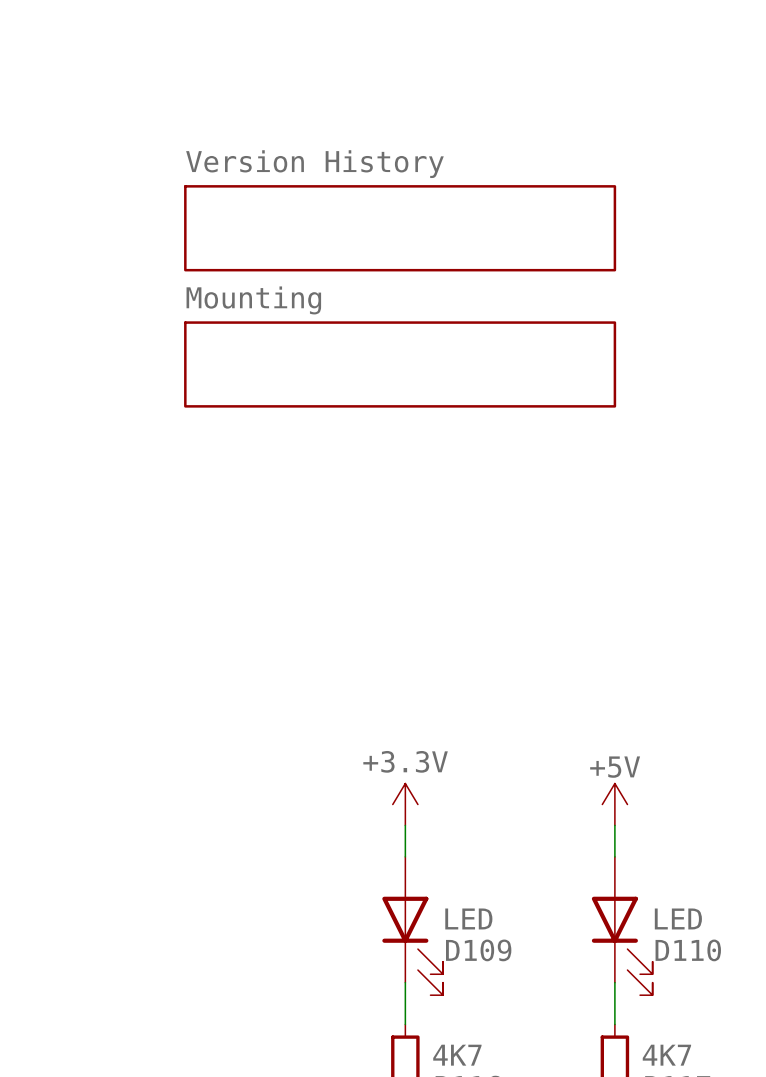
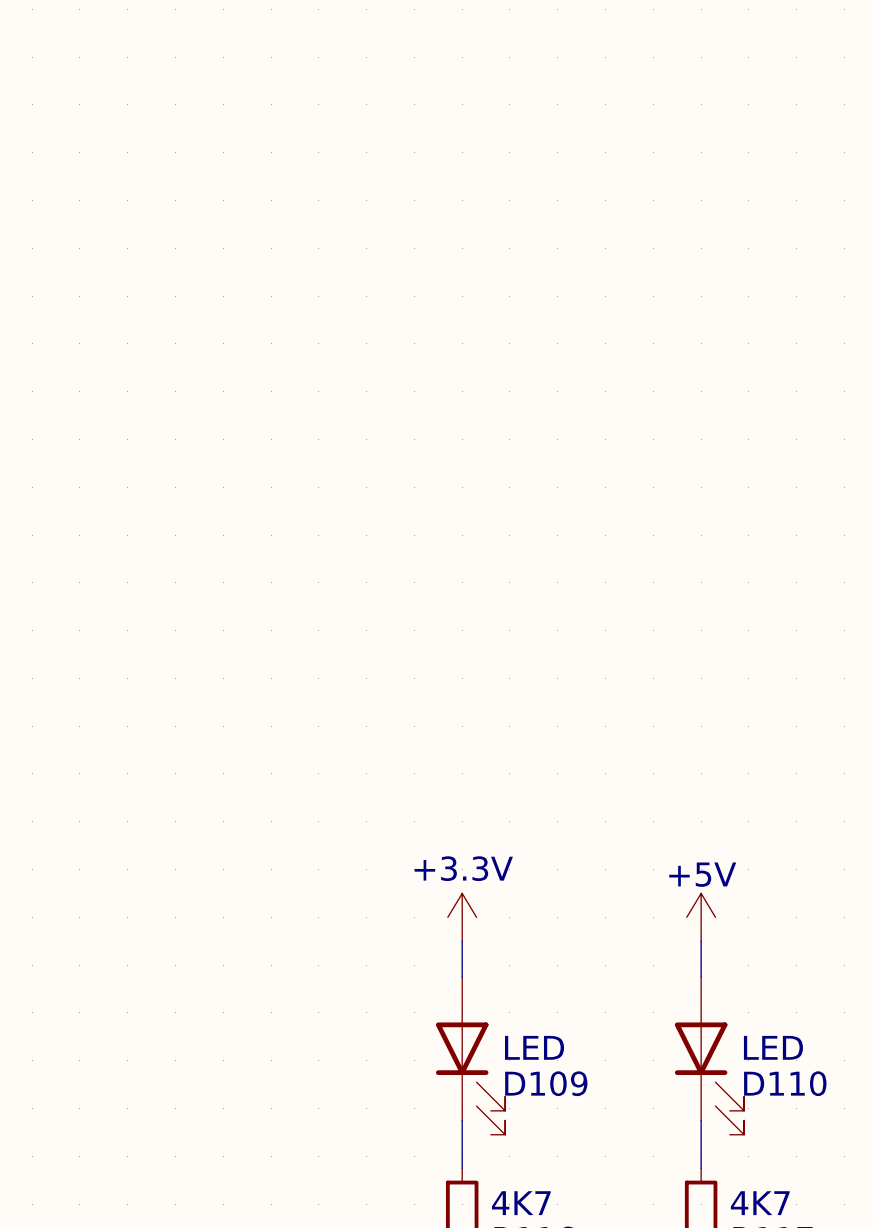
sheet Version History: (400, 228) -> none
sheet Mounting: (400, 364) -> none

